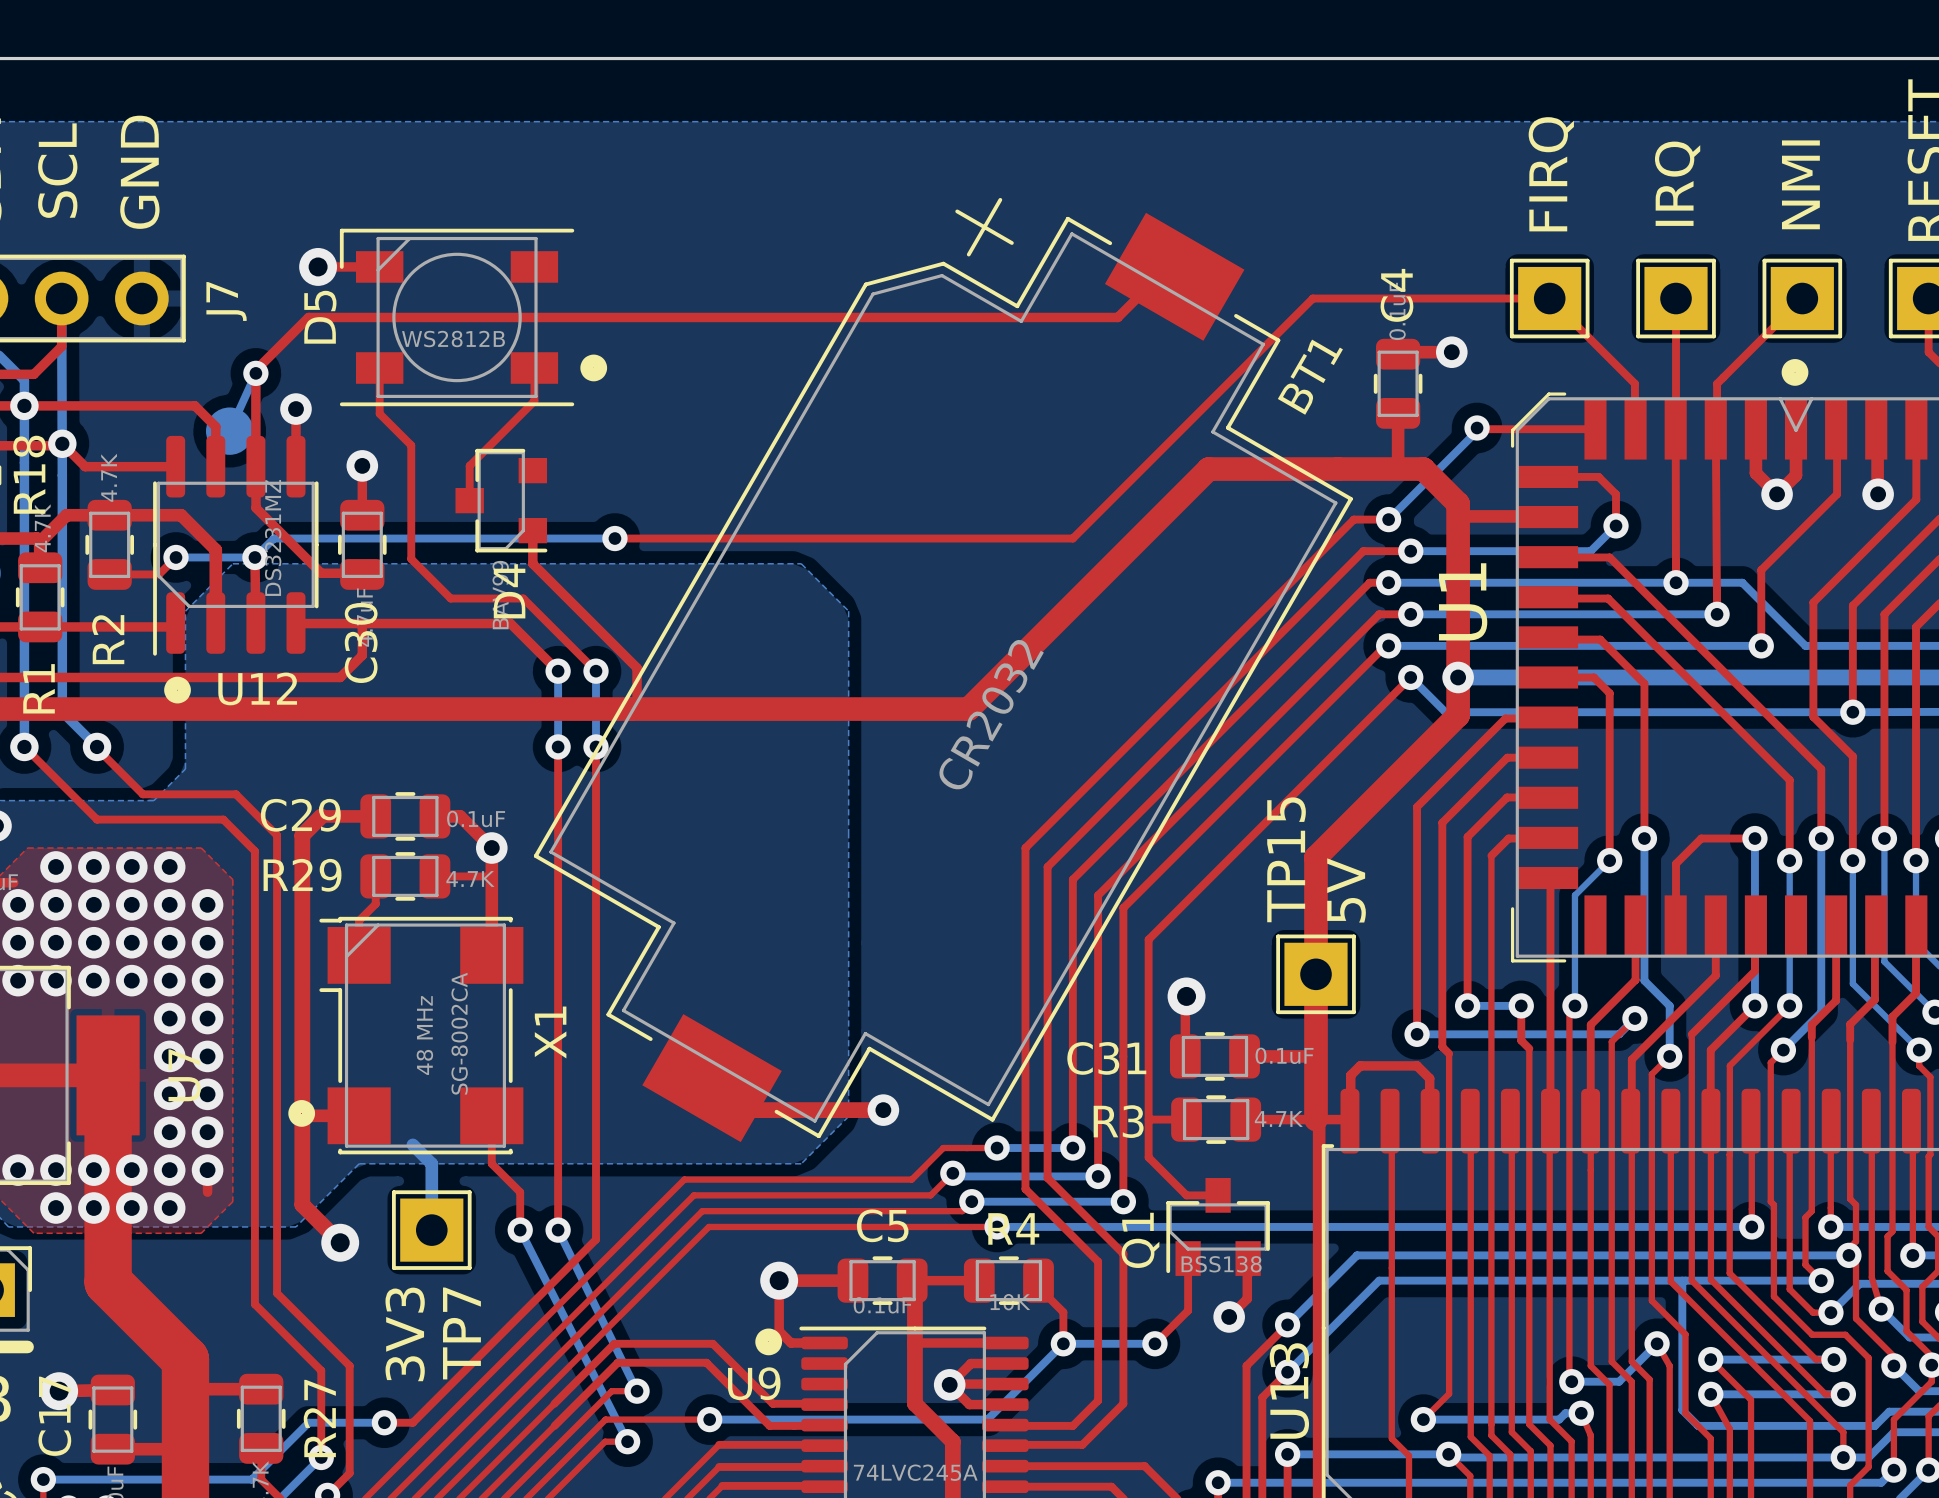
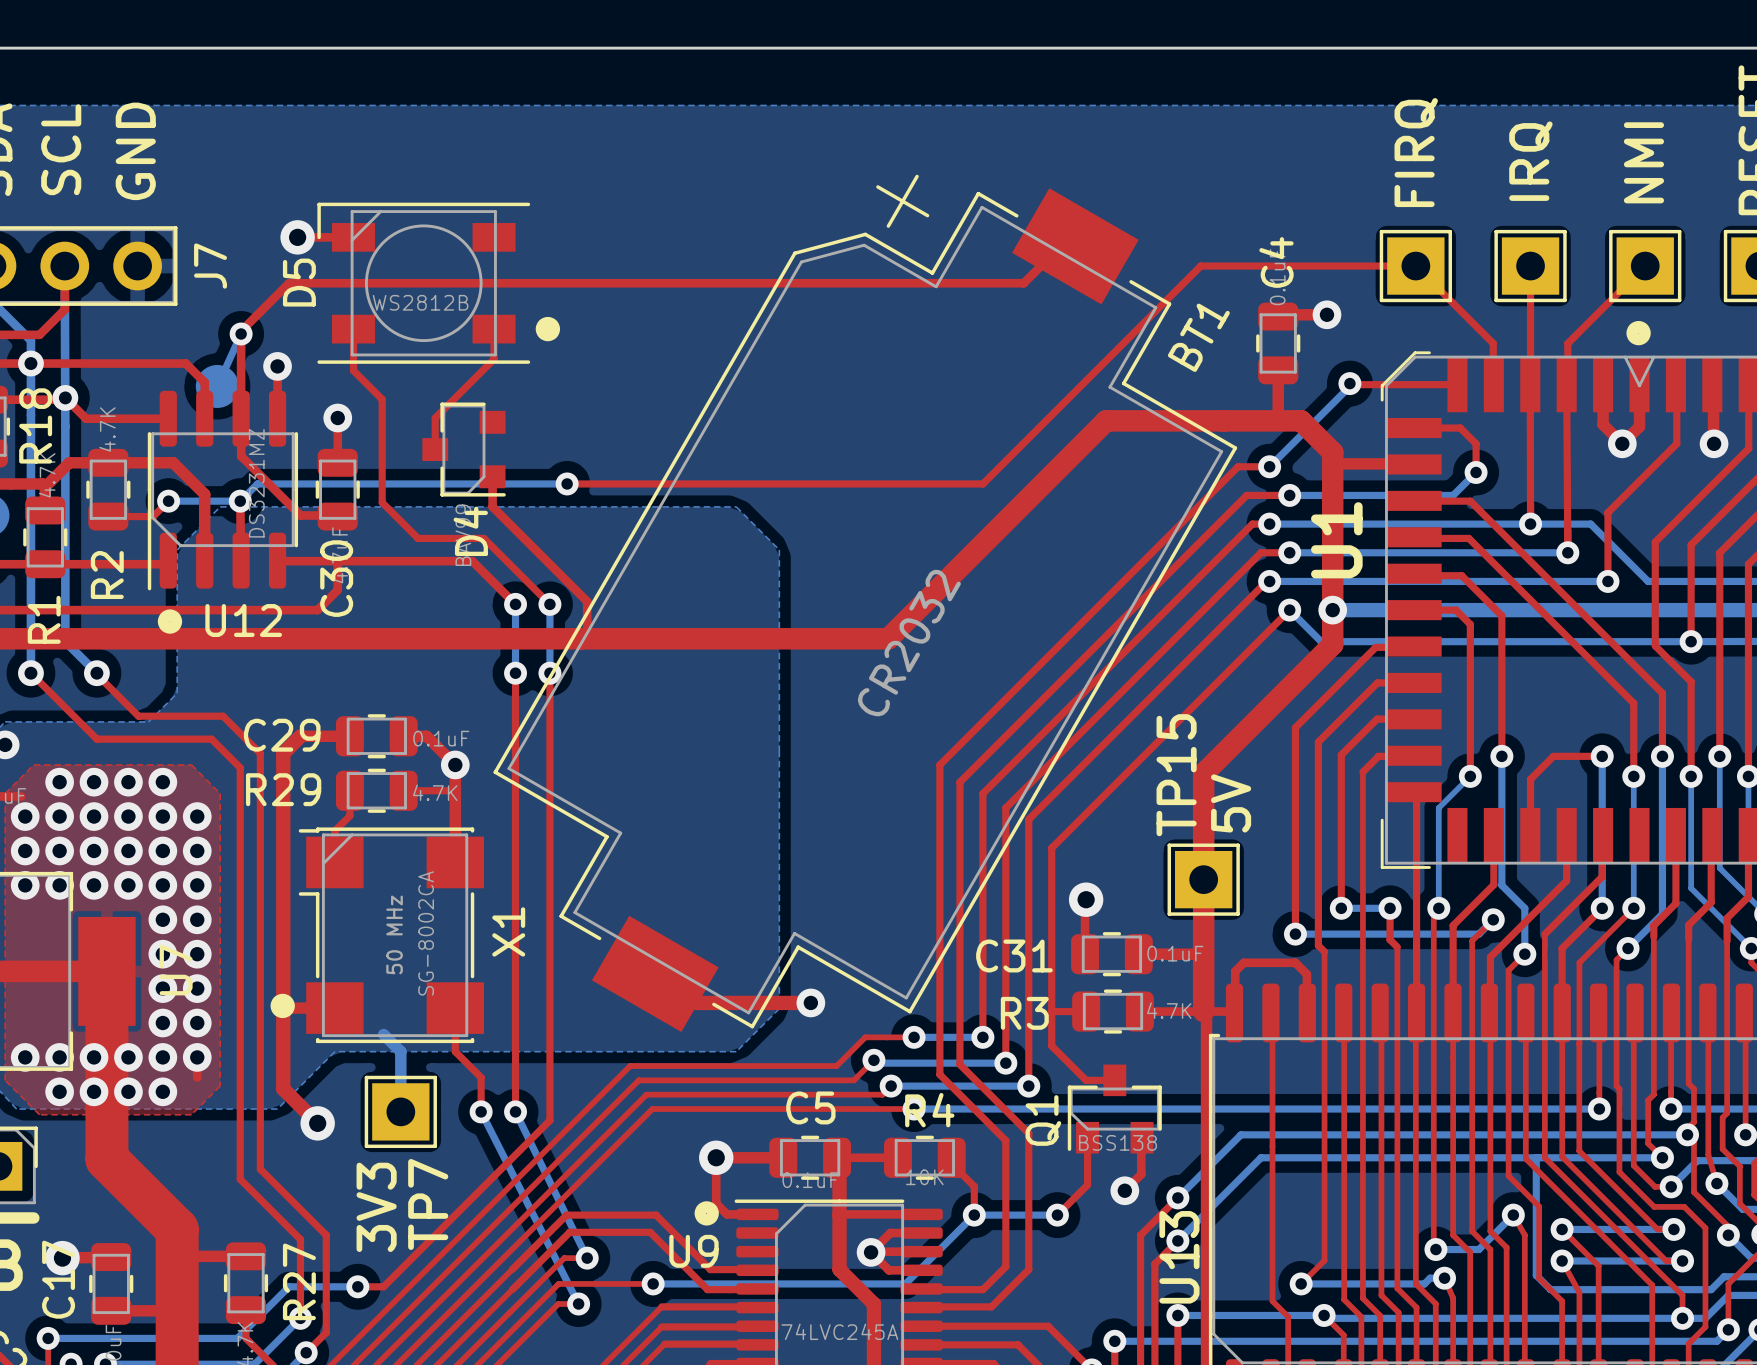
X1 text: 48 MHz (424, 1035) -> 50 MHz (394, 934)

